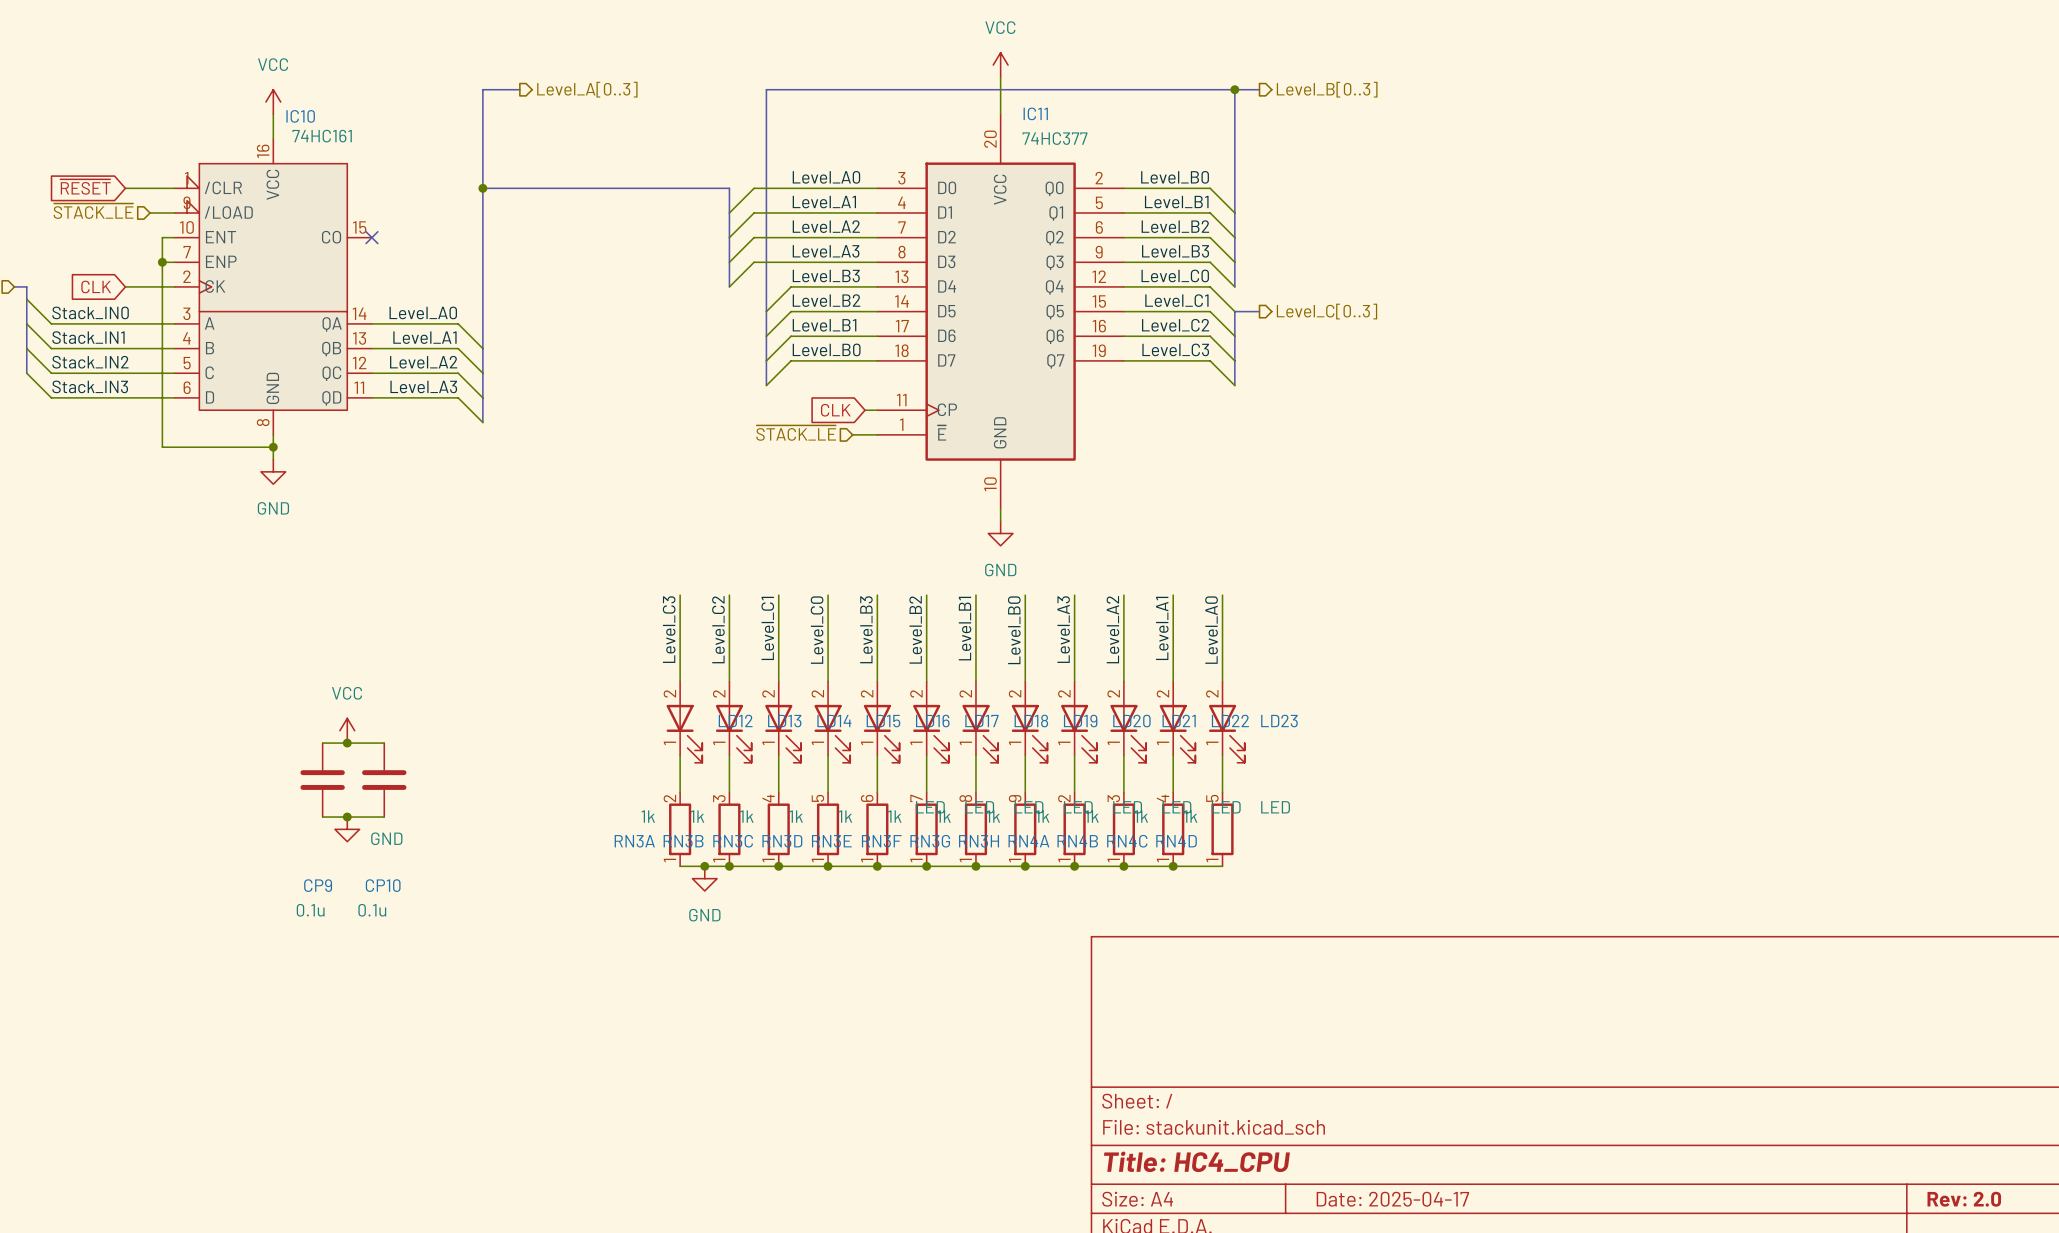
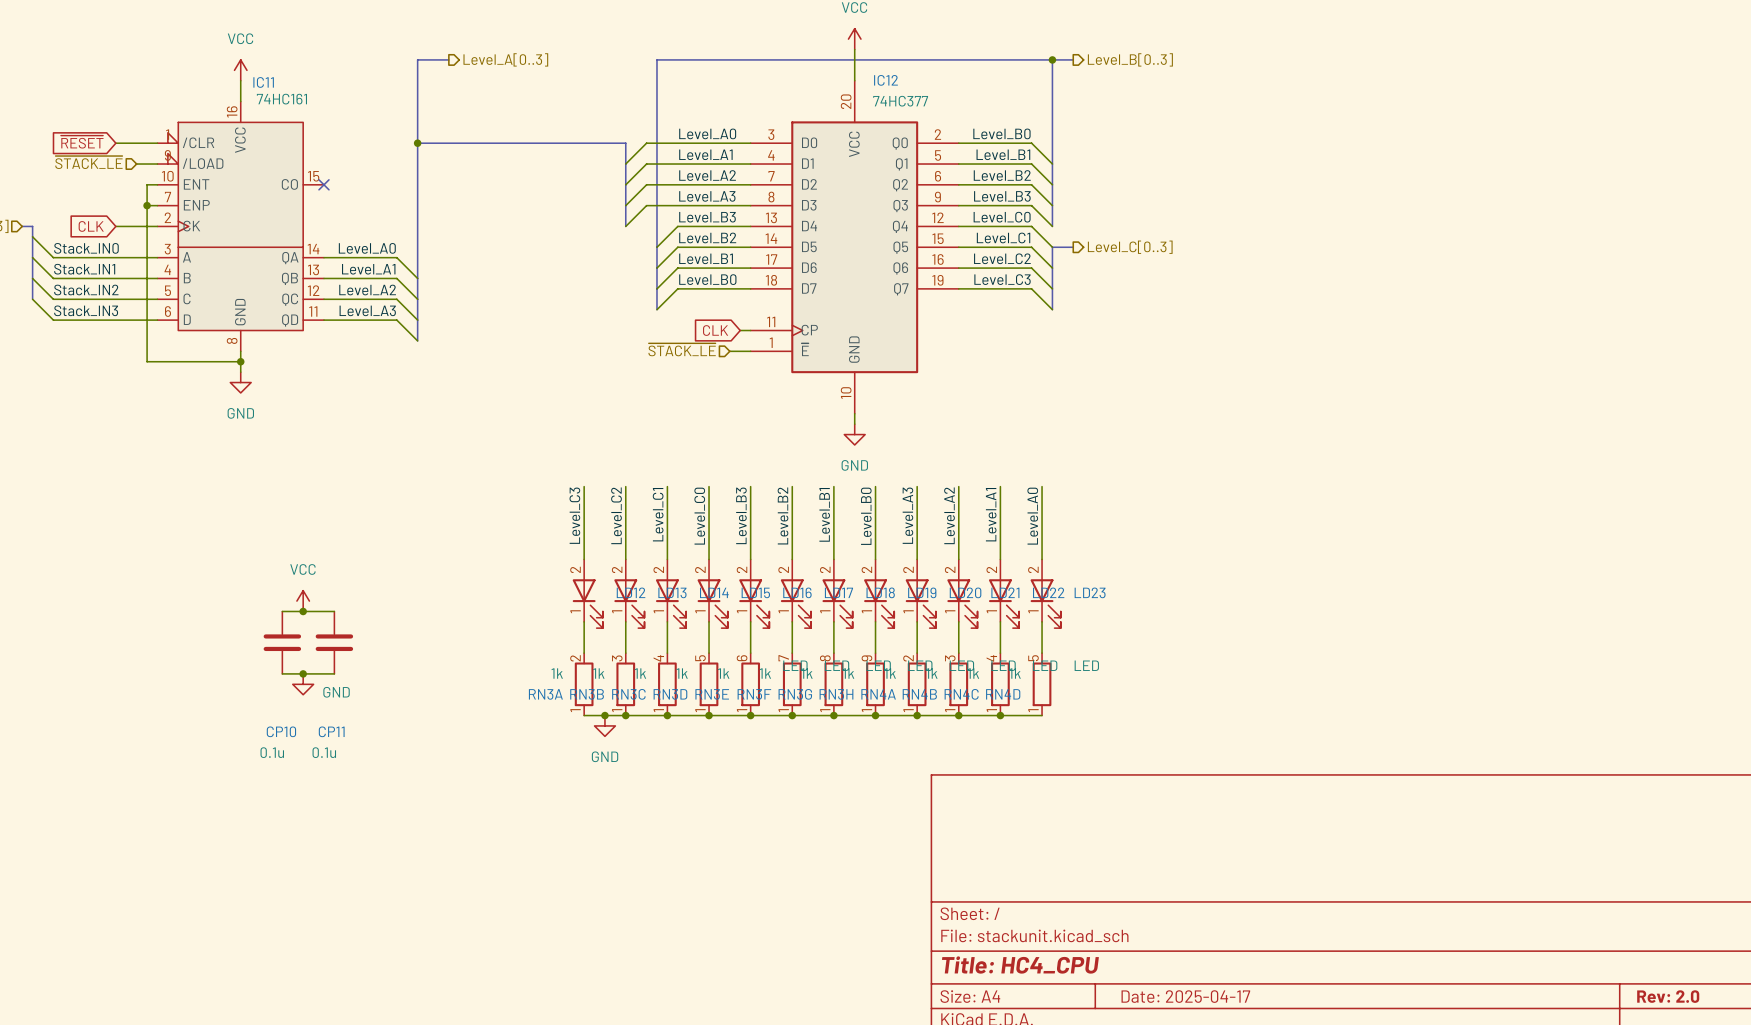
IC11 name: IC11 (1035, 113) -> IC12 (885, 80)
IC10 name: IC10 (300, 116) -> IC11 (263, 82)
CP9 name: CP9 (318, 885) -> CP10 (281, 731)
CP10 name: CP10 (383, 885) -> CP11 (331, 731)

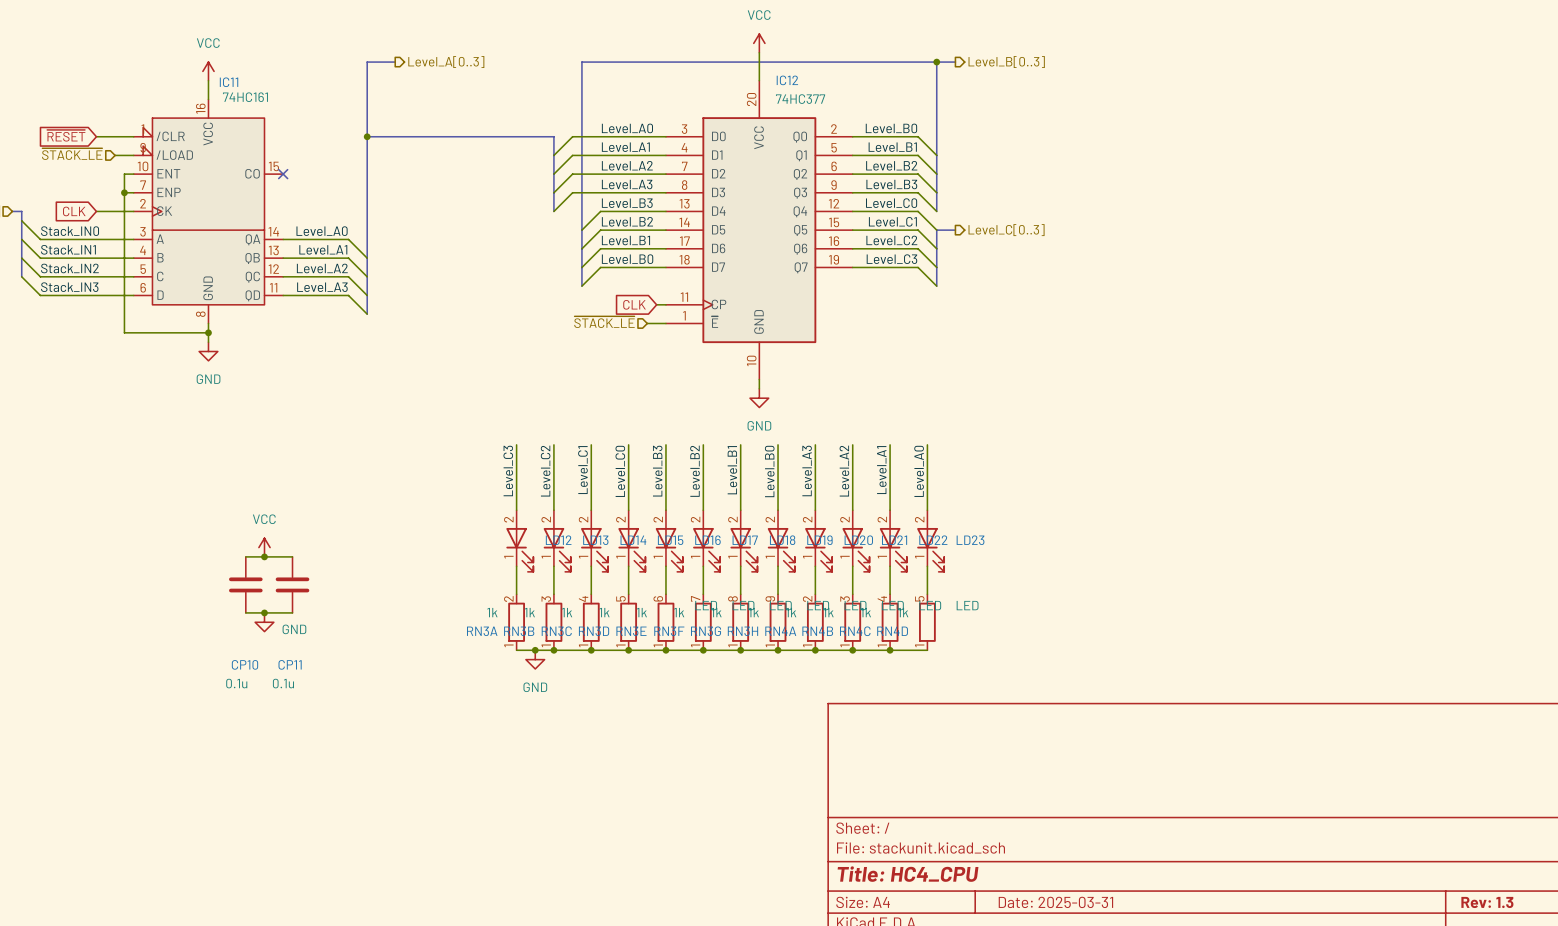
title block: Date: 2025-04-17 (1185, 996) -> Date: 2025-03-31 (1055, 902)
title block: Rev: 2.0 (1668, 996) -> Rev: 1.3 (1487, 902)

